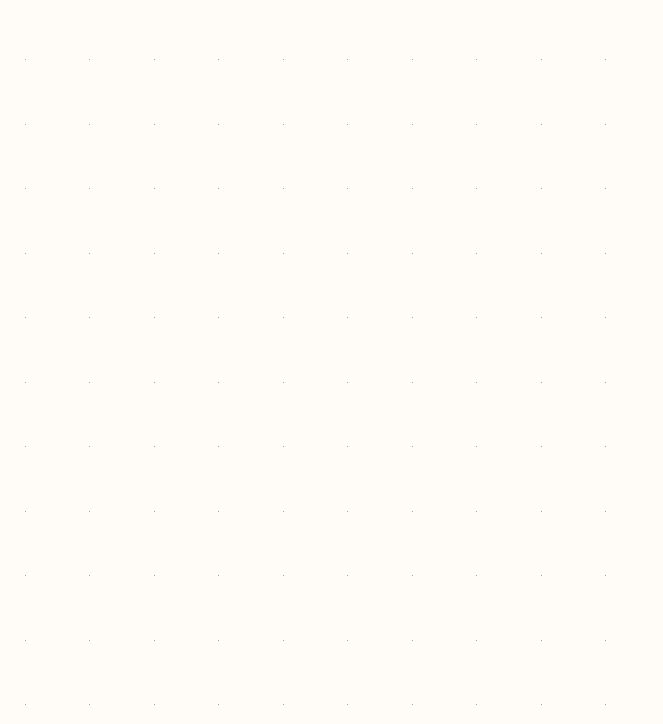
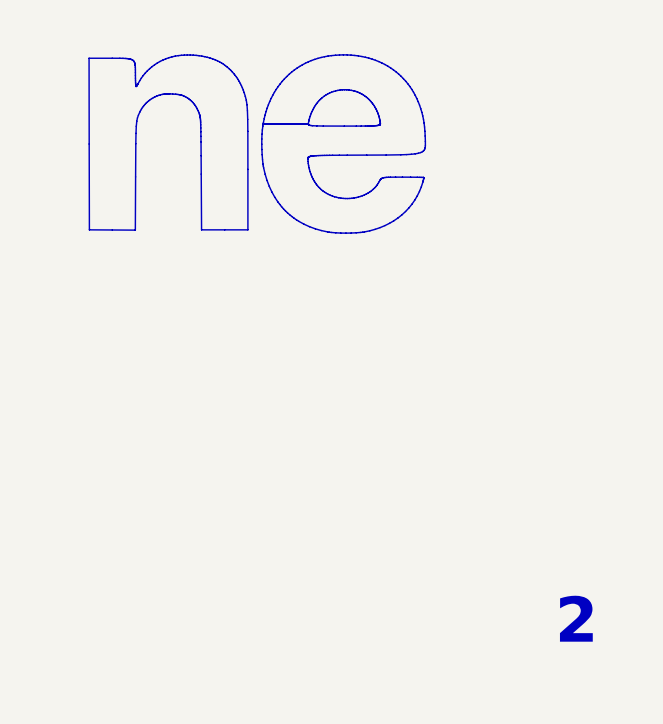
line: none -> (138, 83) (145, 73) (154, 64) (165, 58) (181, 55) (199, 55) (215, 59) (225, 65) (235, 75) (242, 87) (246, 104) (247, 229) (201, 229) (200, 116)
line: none -> (135, 85) (135, 64) (132, 60) (89, 58) (89, 229) (135, 230) (136, 126) (138, 115) (146, 103) (160, 94) (180, 94) (192, 102) (199, 114)
line: none -> (380, 122) (376, 110) (368, 99) (357, 91) (344, 89) (331, 92) (320, 99) (312, 110) (308, 124) (263, 124)
line: none -> (263, 124) (263, 164) (271, 191) (289, 214) (315, 228) (331, 232) (356, 232) (384, 225) (398, 217) (408, 207) (417, 195) (423, 178)
line: none -> (263, 124) (269, 101) (282, 81) (299, 66) (321, 57) (347, 54) (372, 59) (393, 69) (409, 86) (418, 101) (423, 119) (425, 145) (422, 151) (406, 154) (312, 156)
line: none -> (308, 124) (377, 125)
line: none -> (307, 159) (310, 173) (317, 185) (326, 193) (340, 198) (354, 197) (366, 194) (382, 177) (423, 177)
text: none -> 2 (576, 618)

